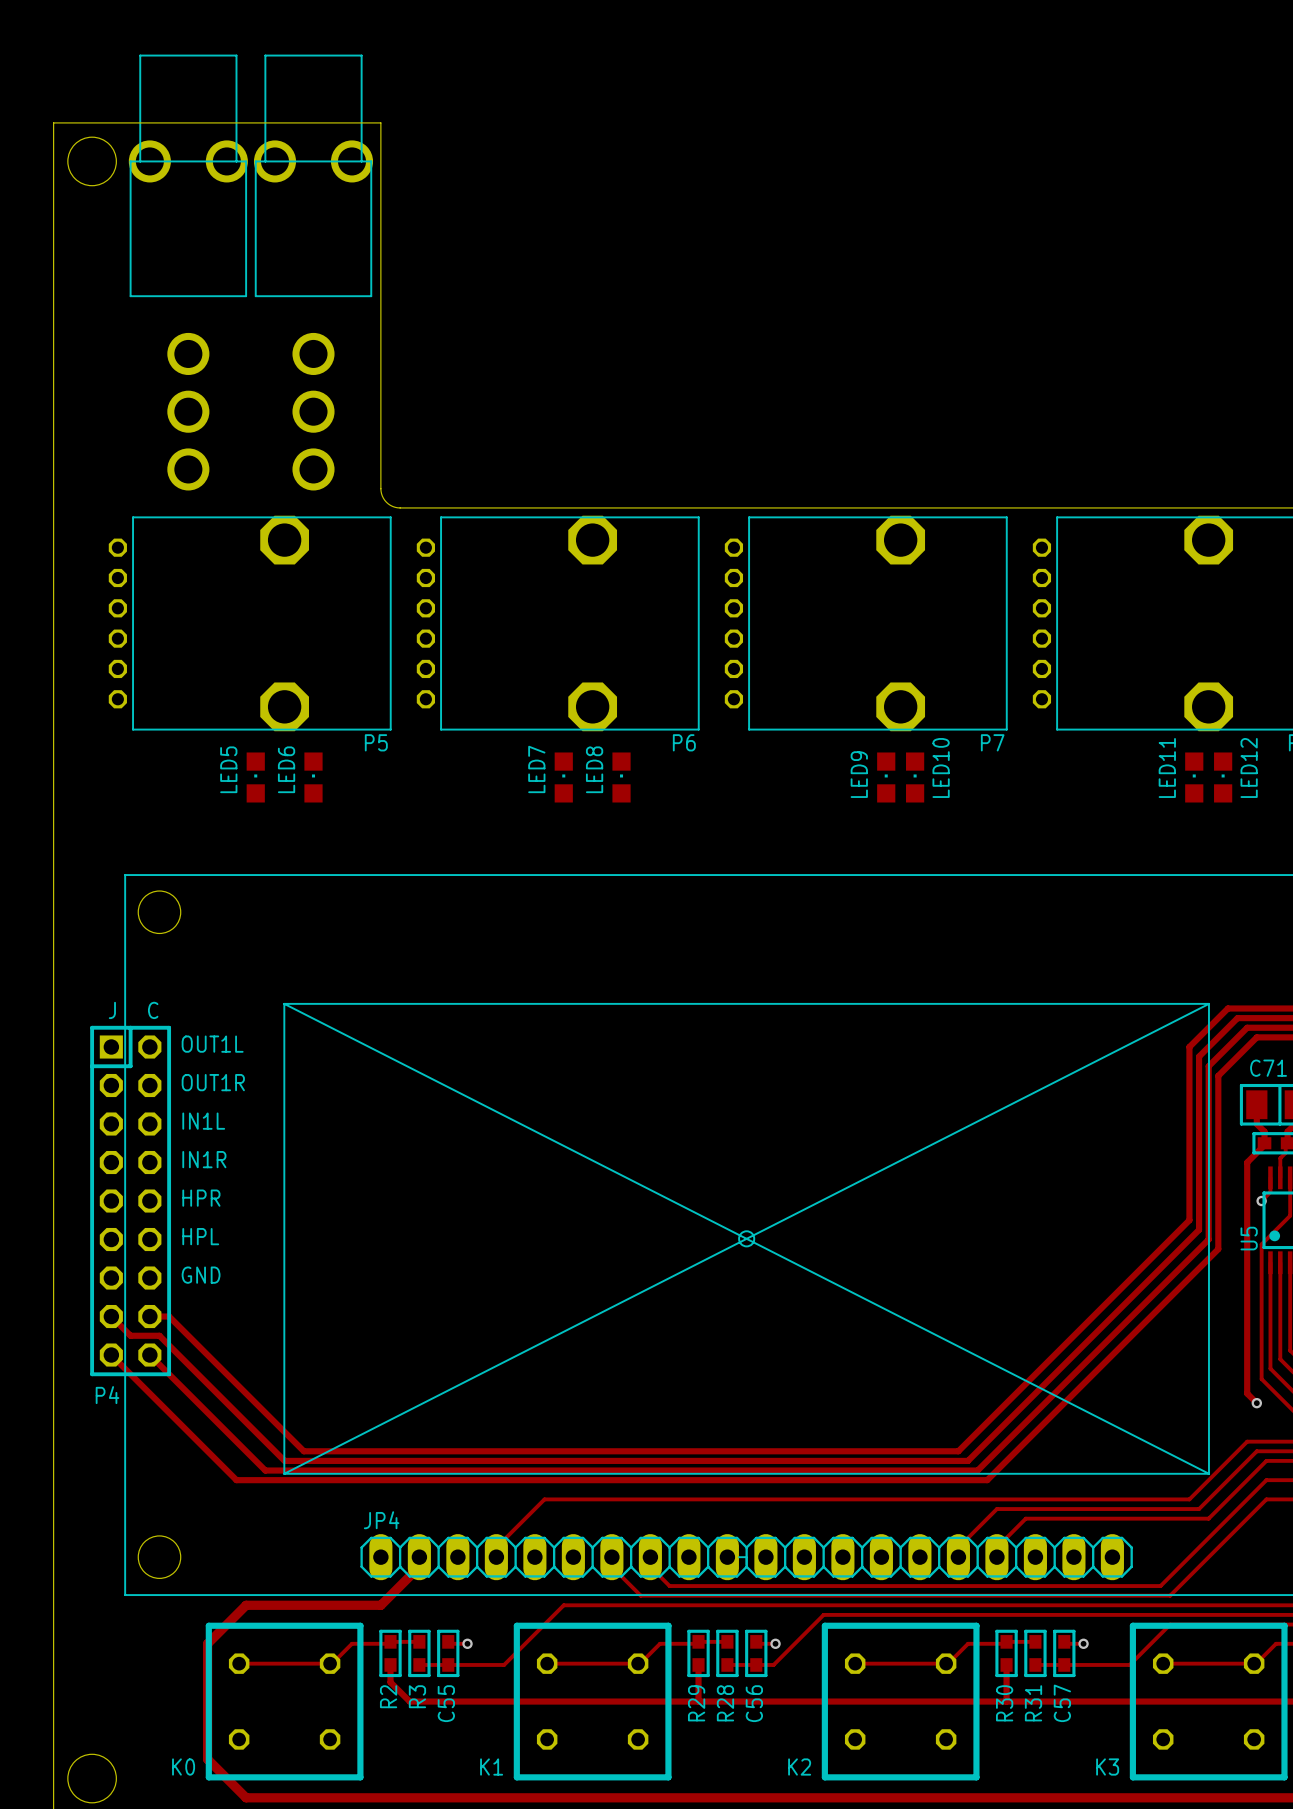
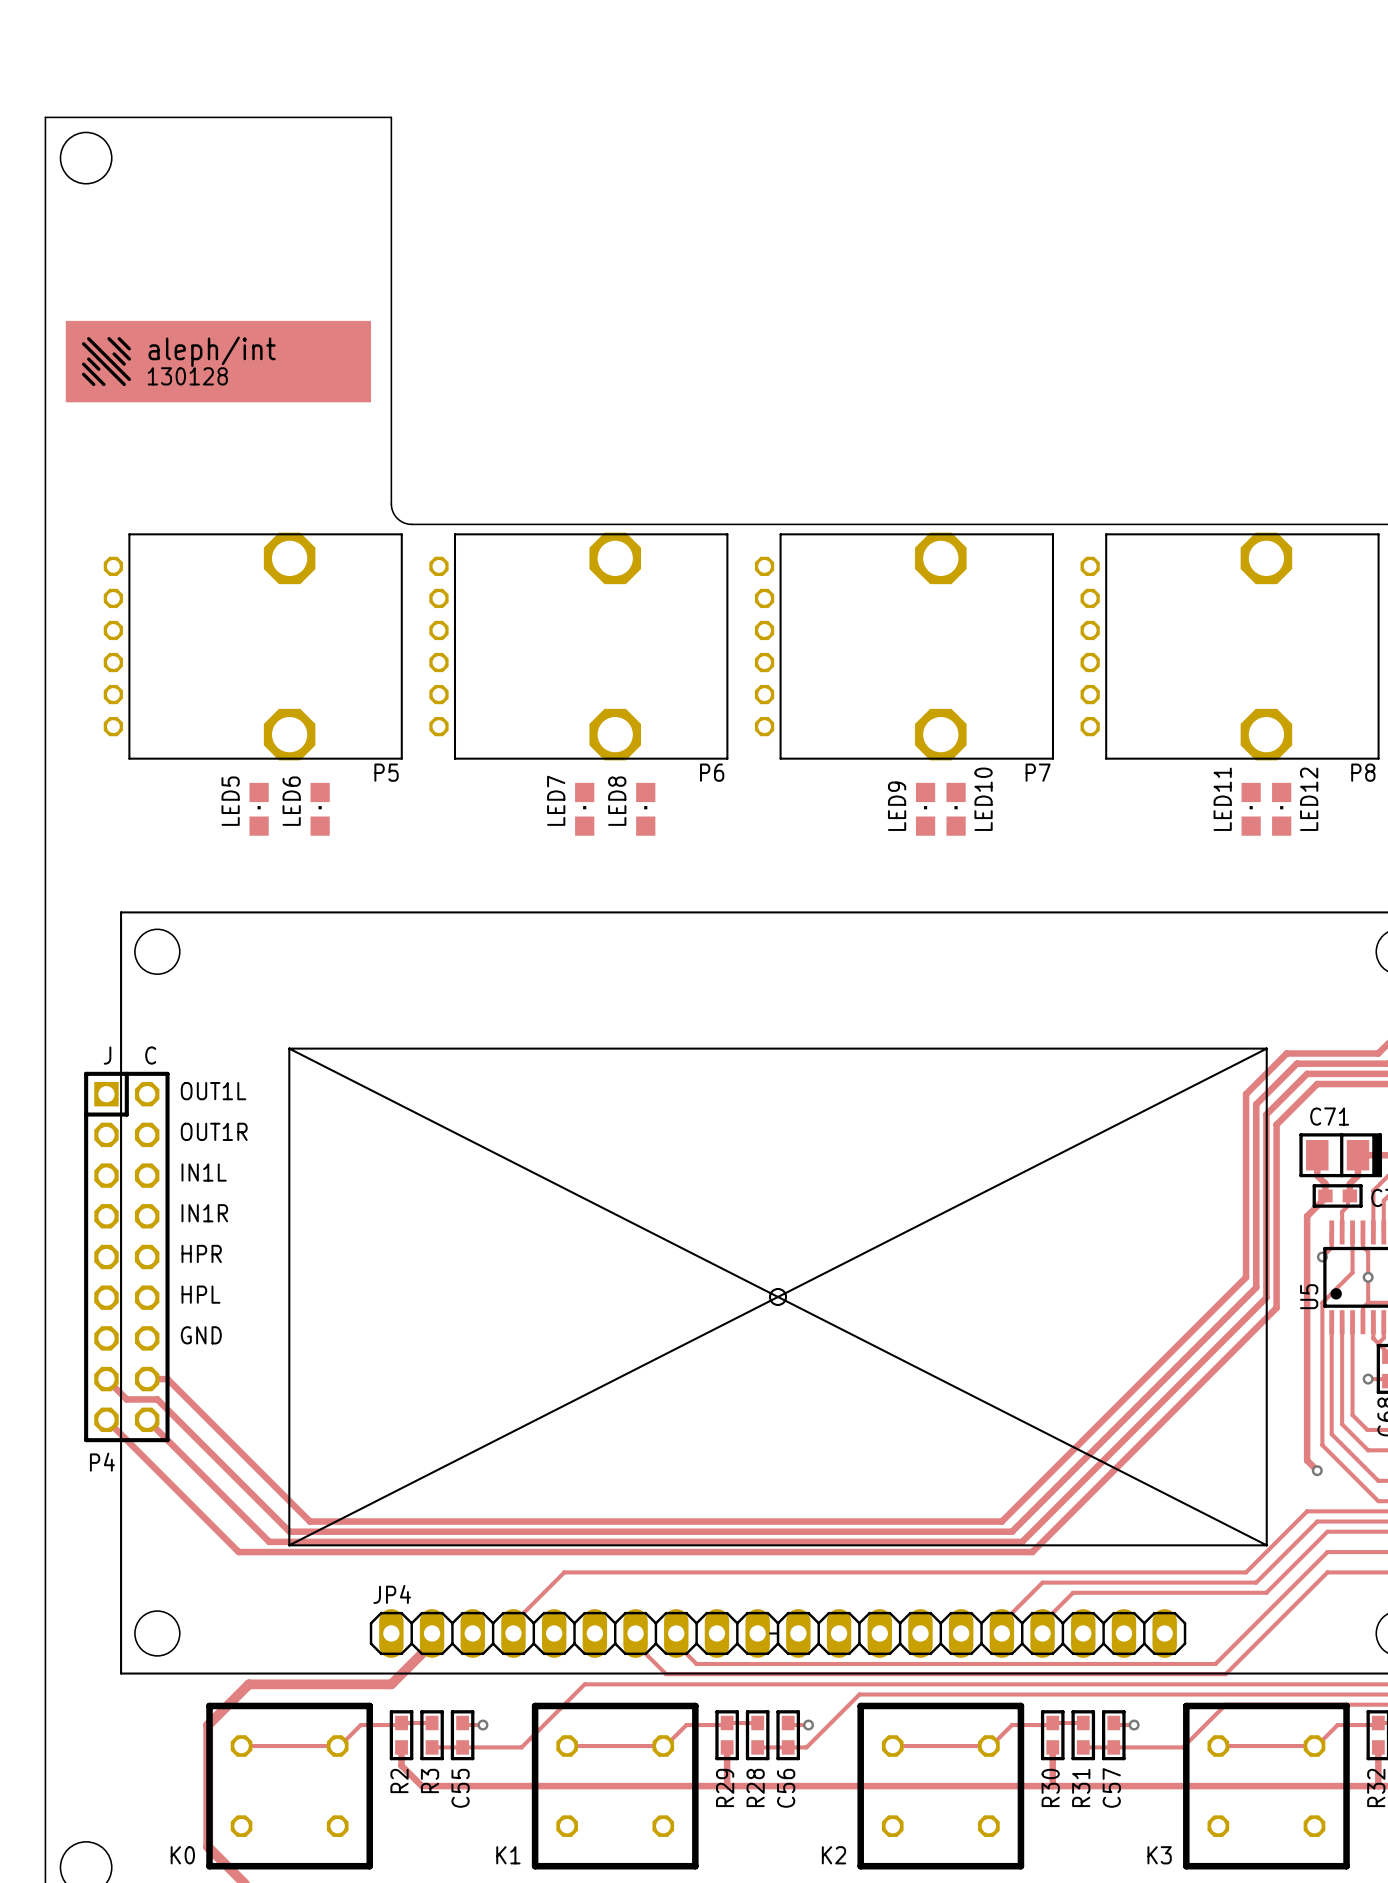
part: (188, 272) -> none
part: (313, 272) -> none
drawing: none -> [65, 320, 372, 403]
line: none -> (88, 338) (129, 379)
line: none -> (109, 338) (129, 359)
line: none -> (119, 338) (129, 348)
line: none -> (83, 343) (124, 384)
text: none -> aleph/int (212, 351)
line: none -> (114, 353) (124, 364)
line: none -> (88, 359) (98, 369)
line: none -> (83, 364) (103, 384)
line: none -> (83, 374) (93, 384)
text: none -> 130128 (187, 376)

